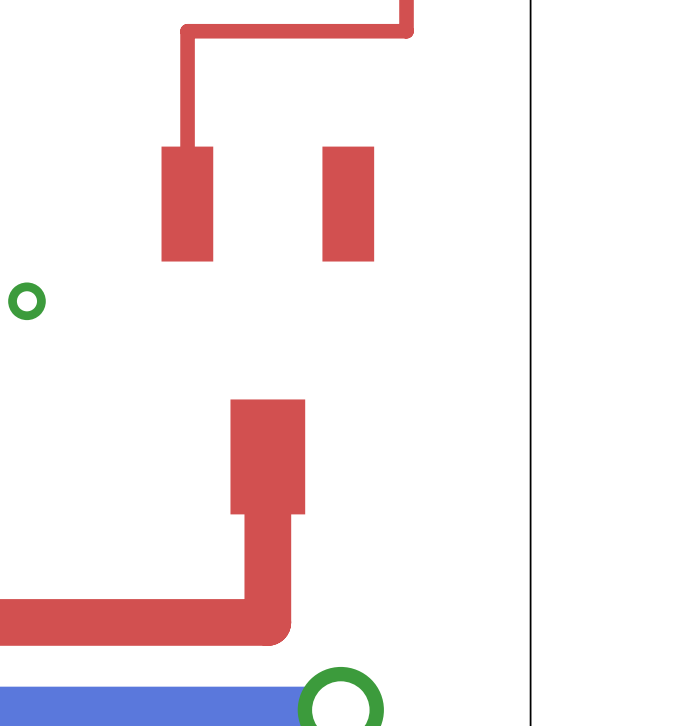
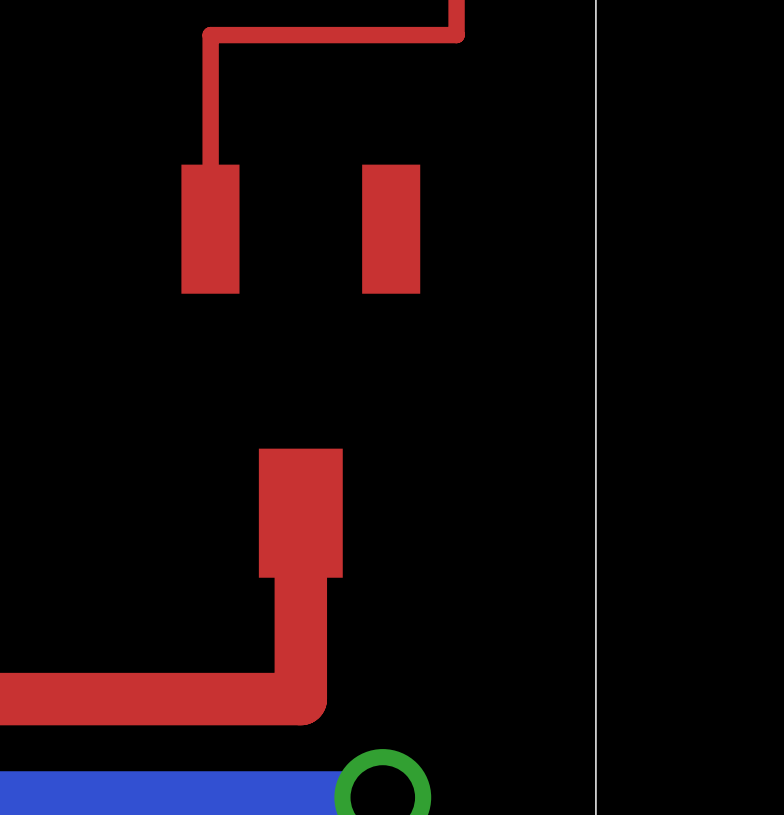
via: (26, 301) -> none

